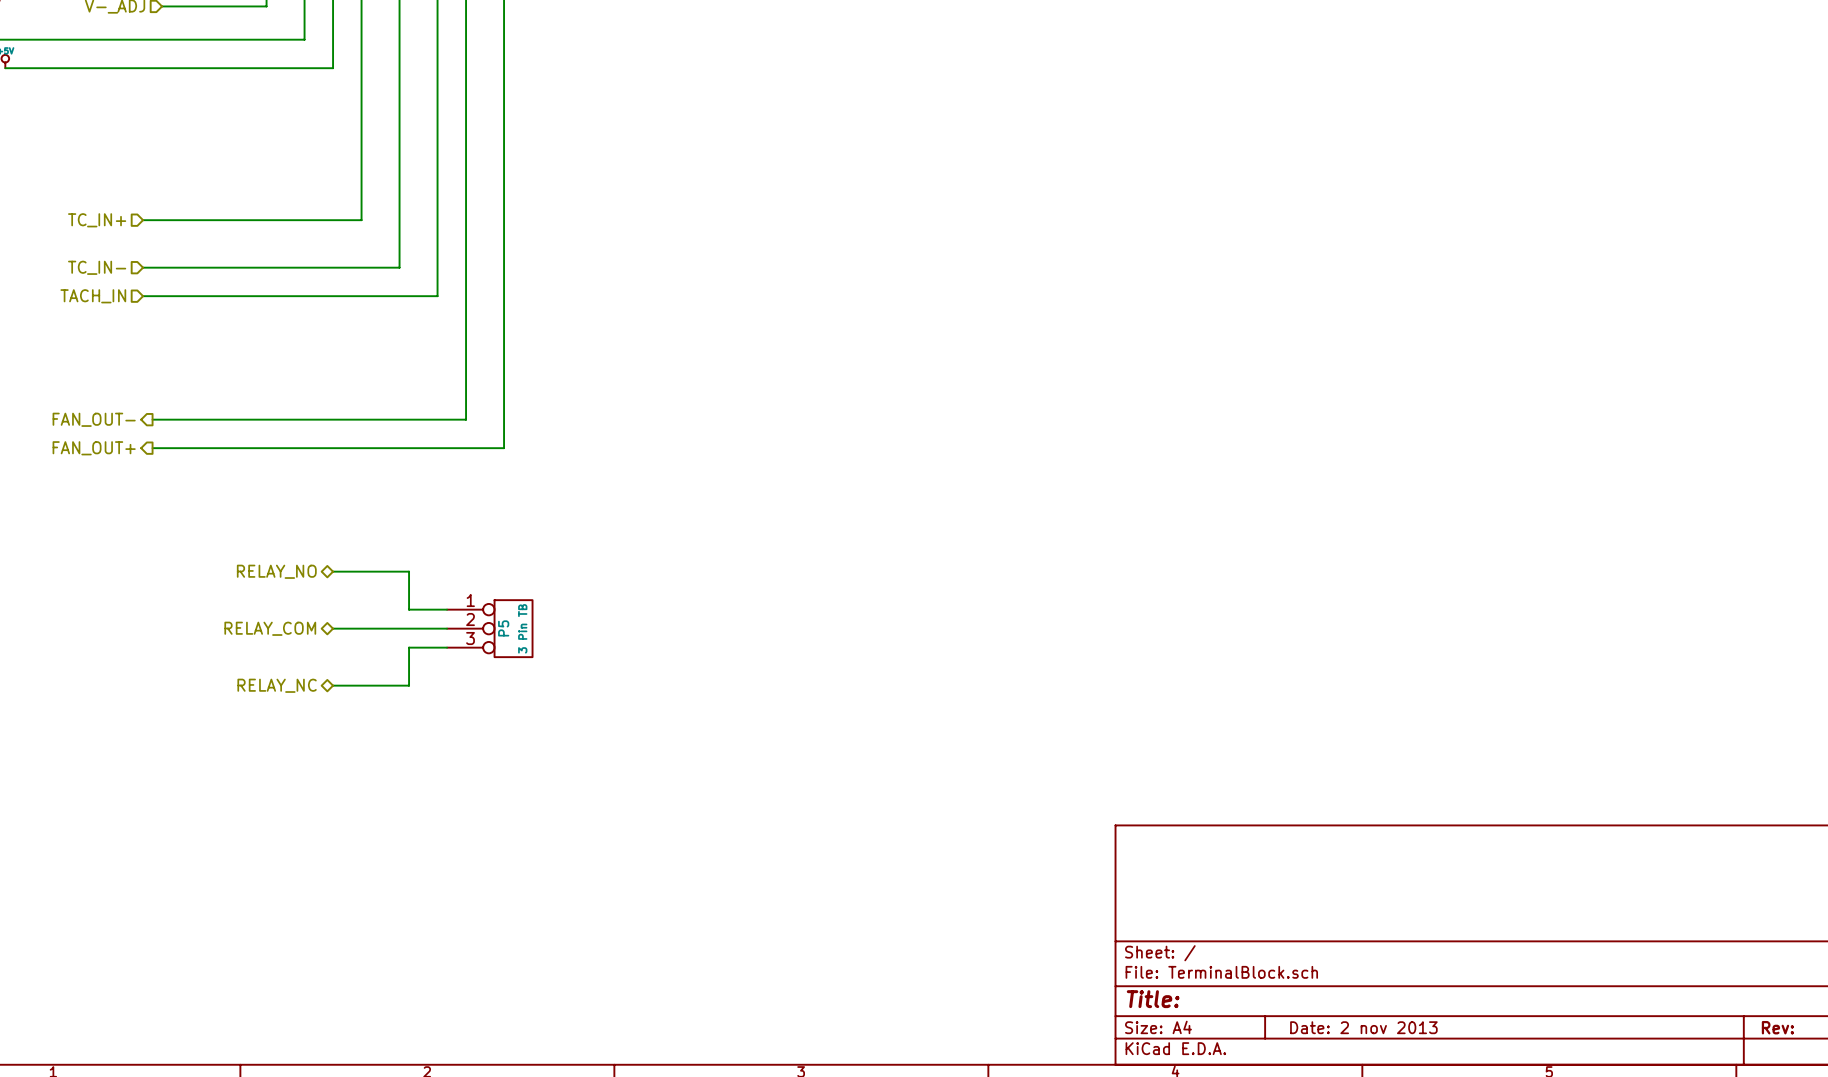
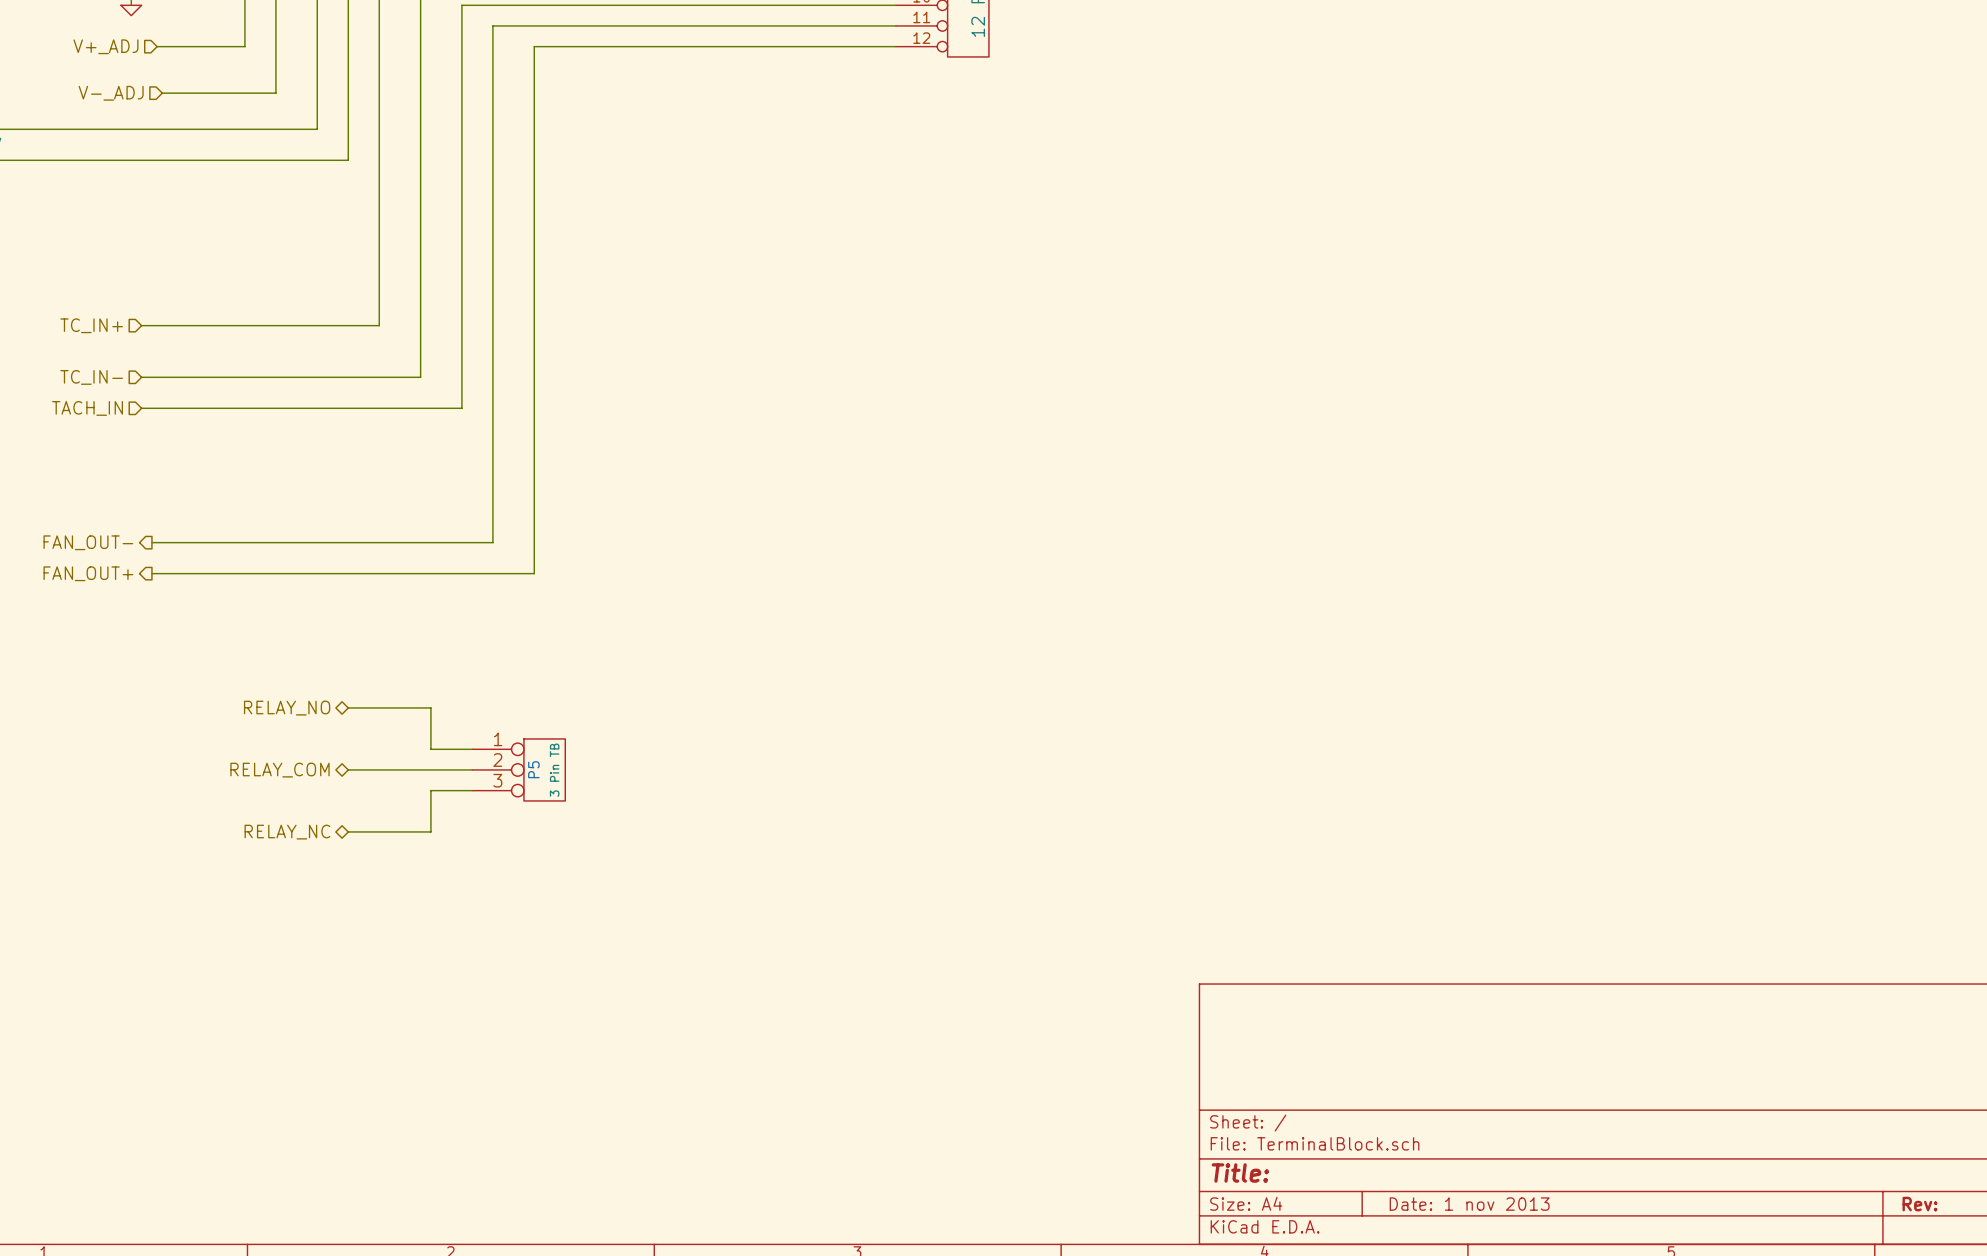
title block: Date: 2 nov 2013 (1363, 1027) -> Date: 1 nov 2013 (1469, 1204)

